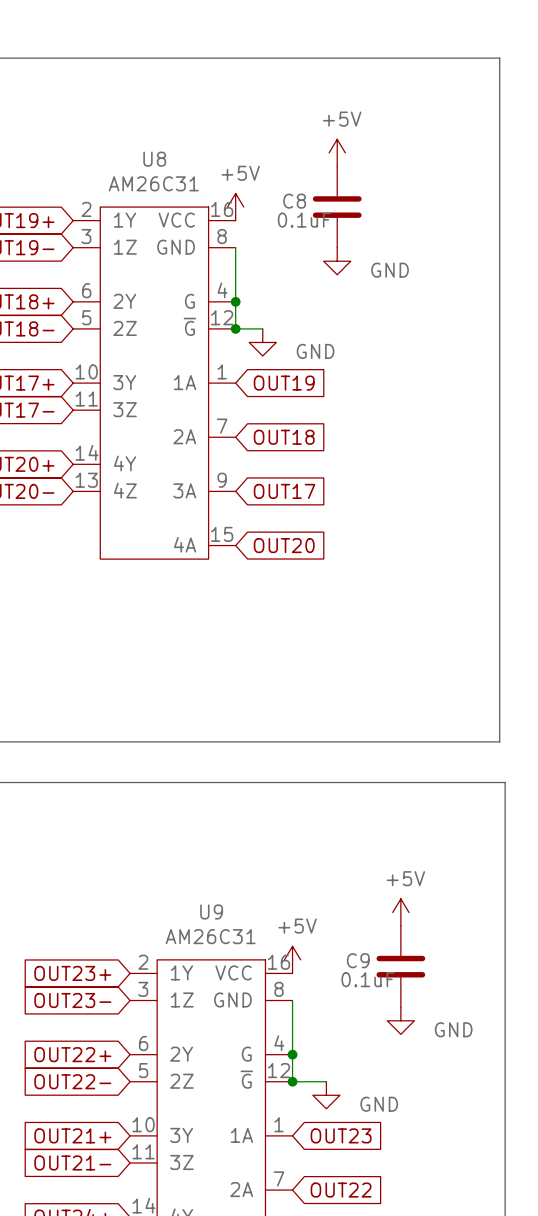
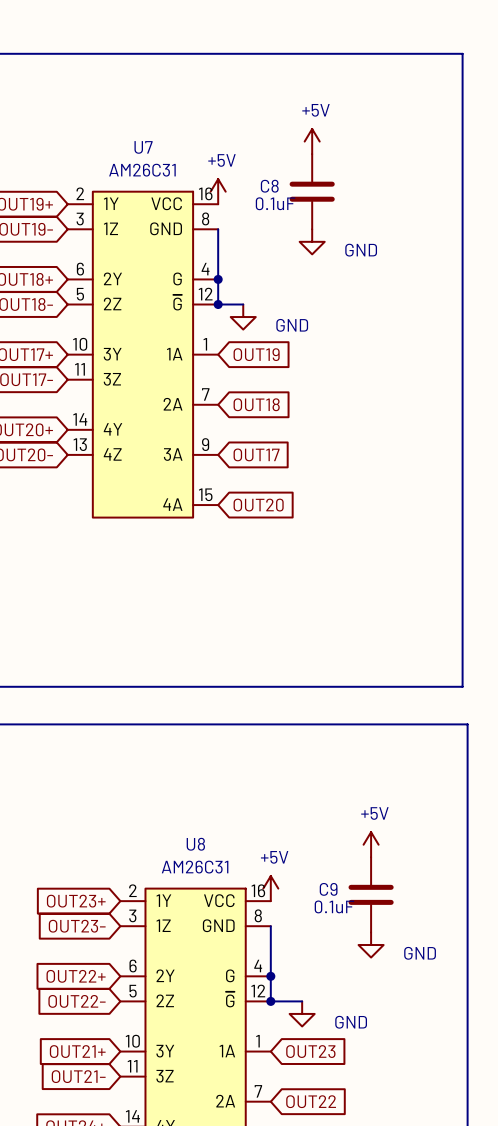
U8 name: U8 (154, 159) -> U7 (143, 147)
U9 name: U9 (211, 911) -> U8 (195, 844)

